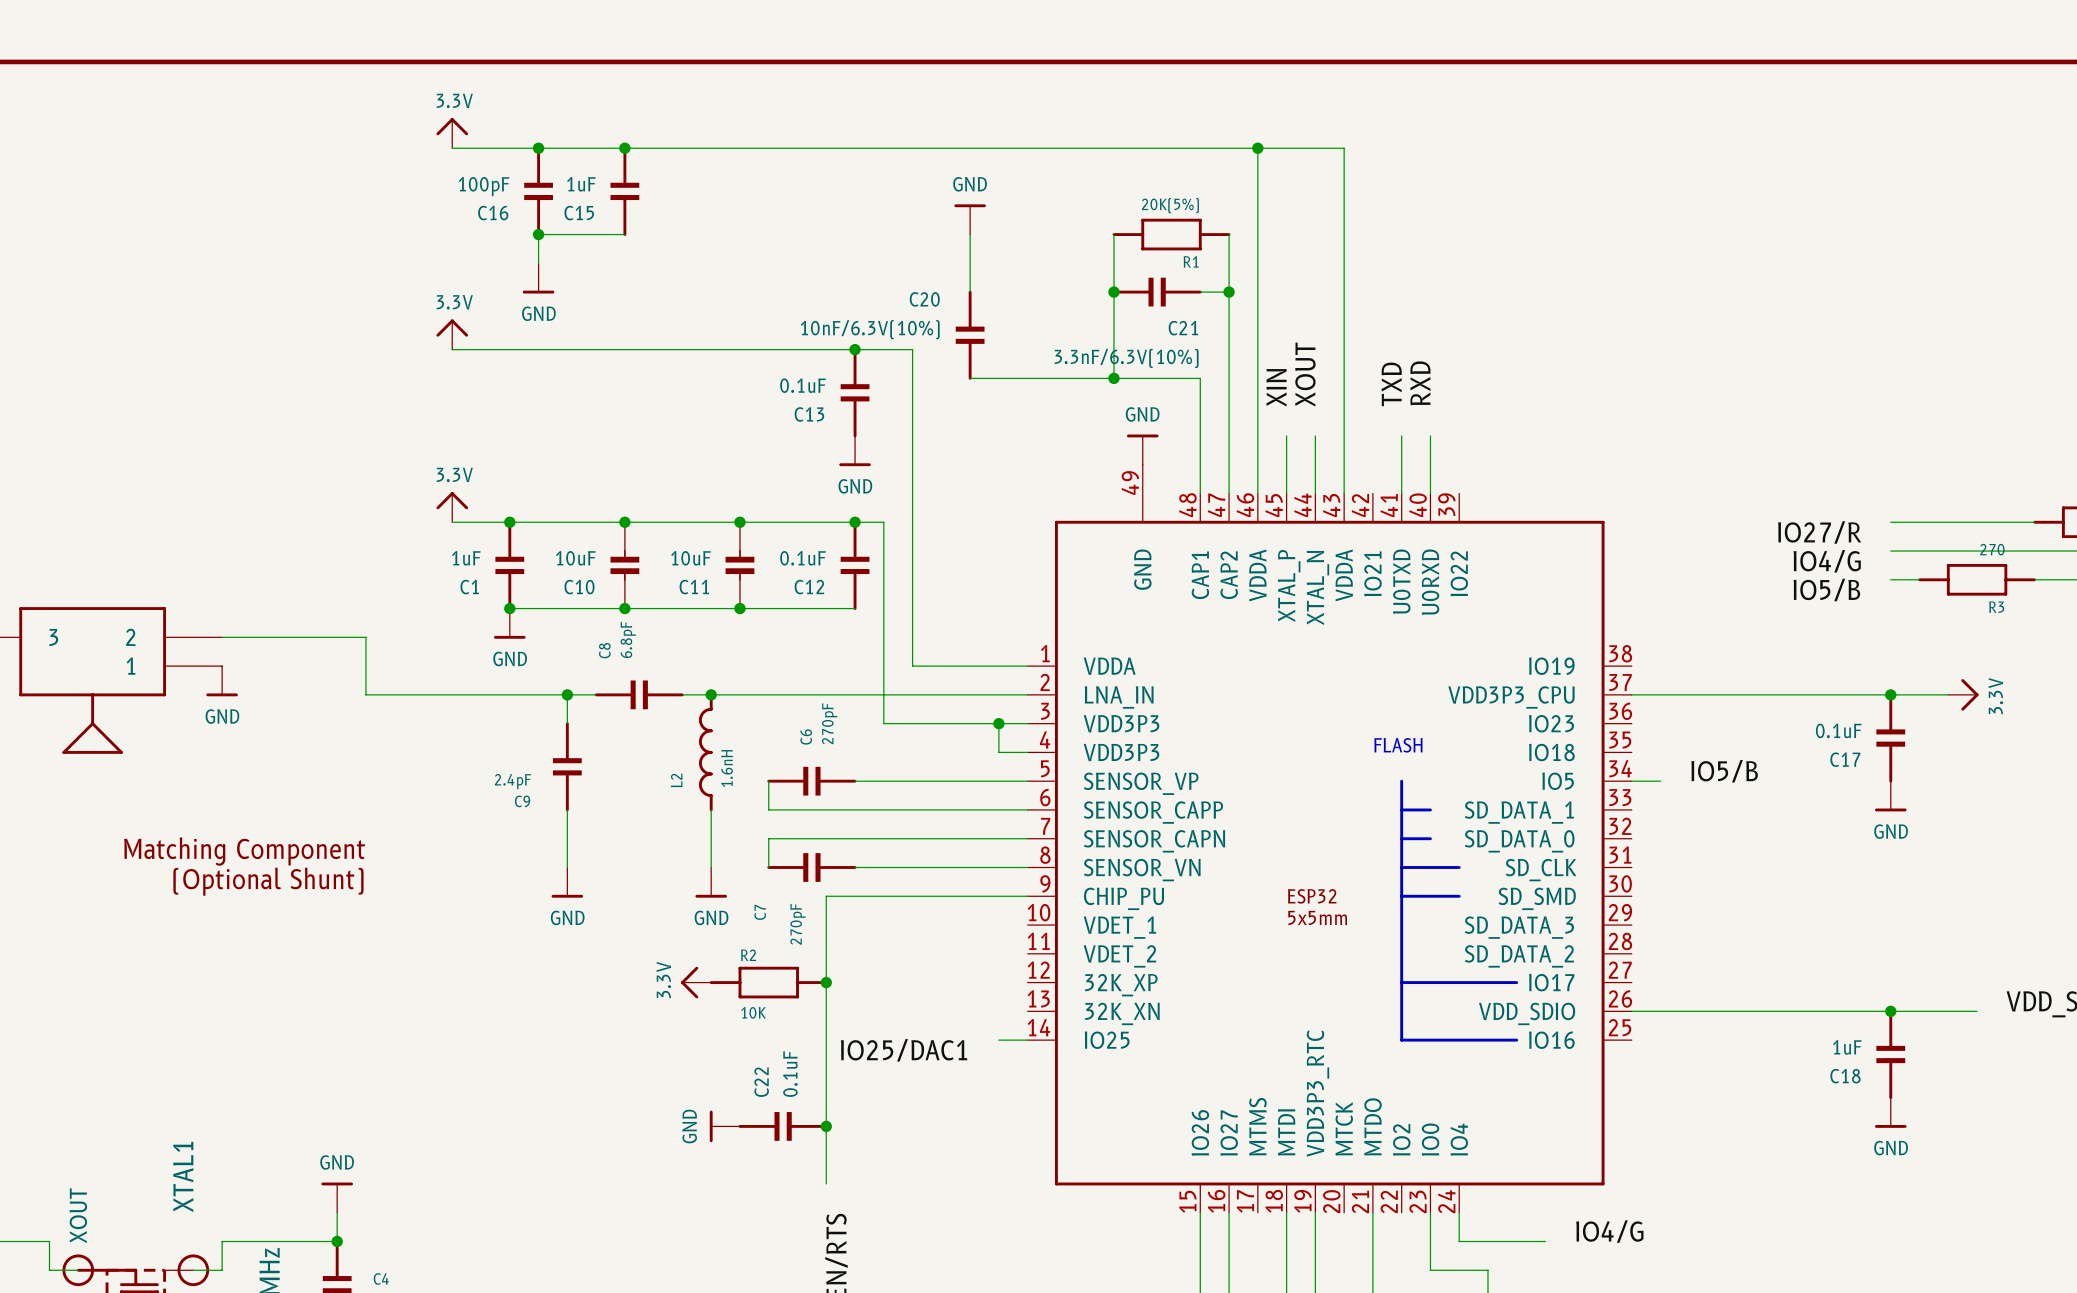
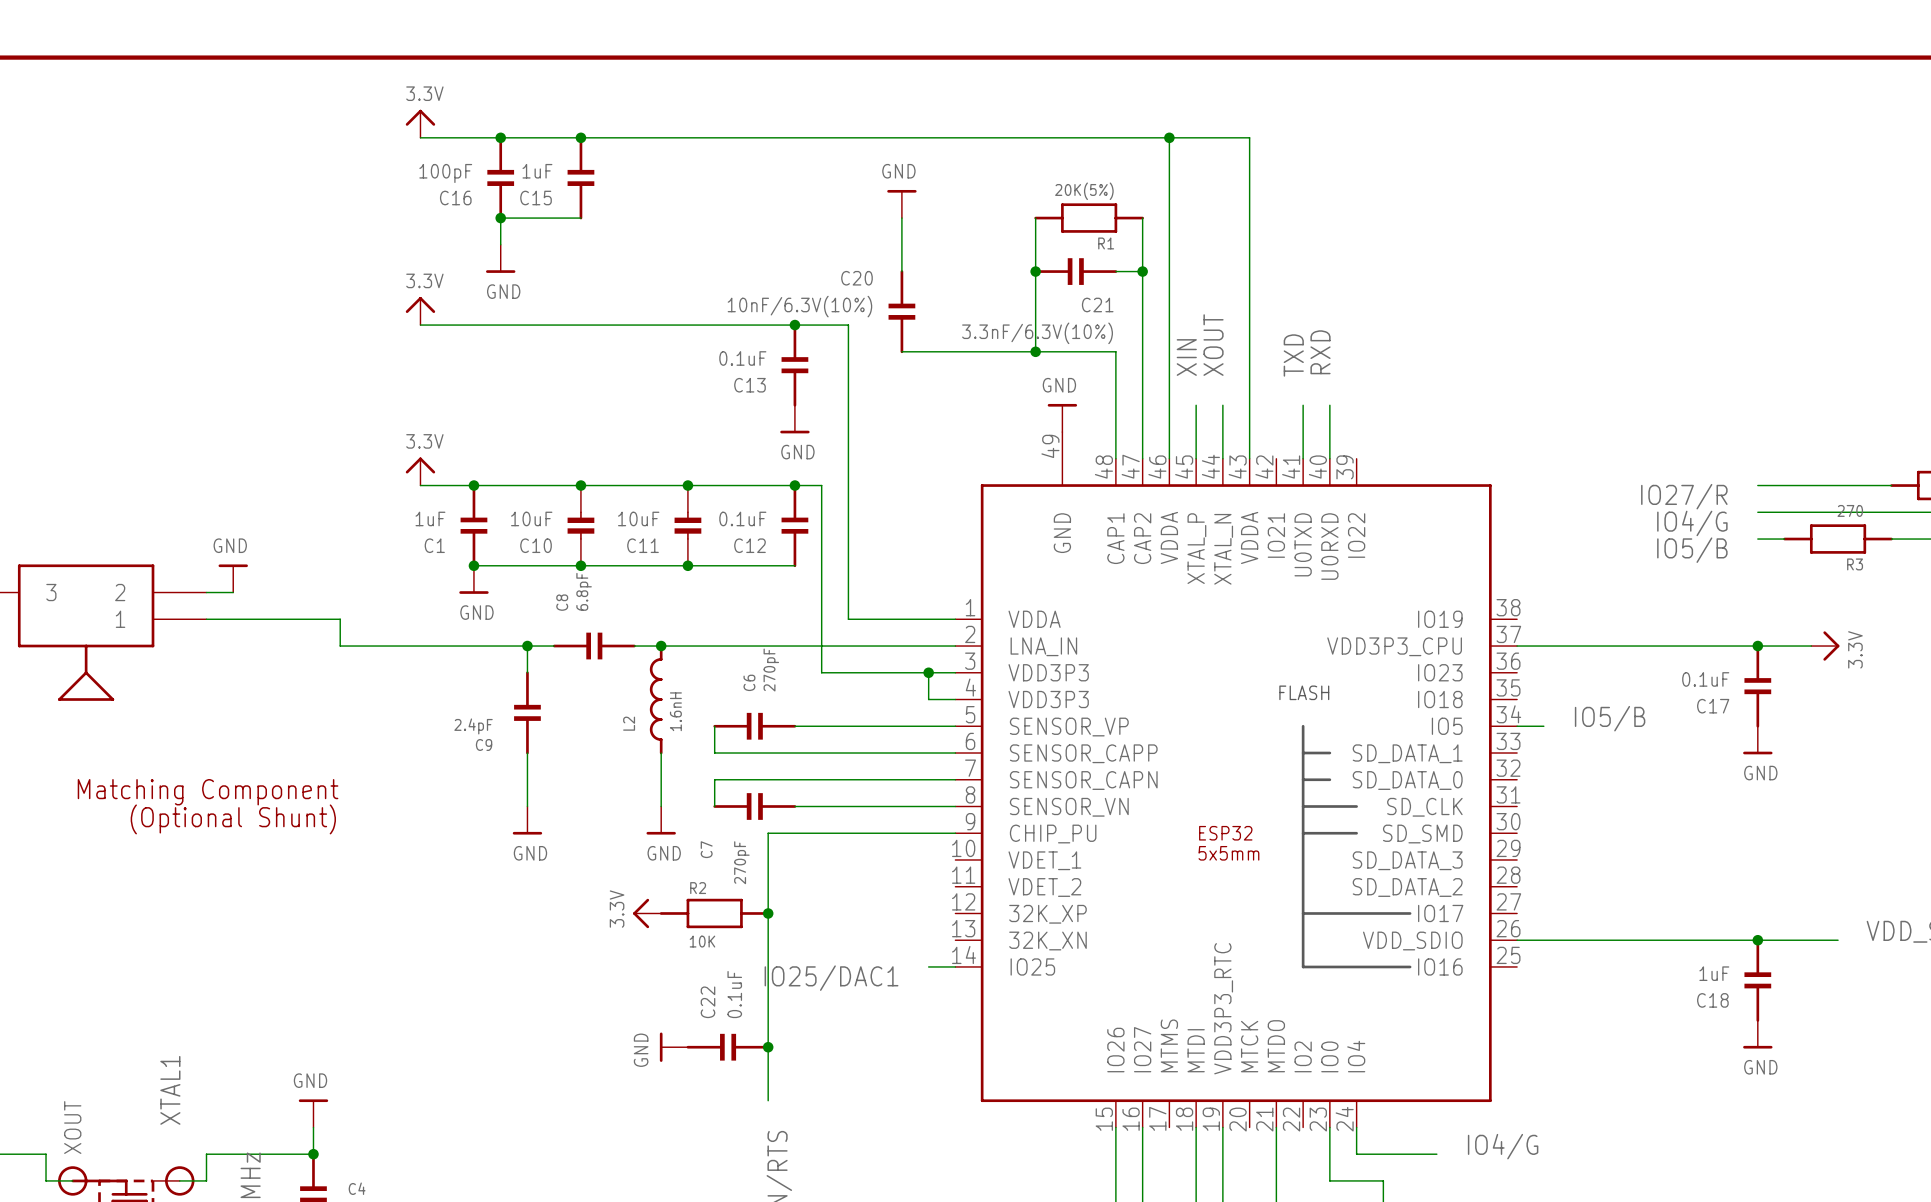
wire: (250, 637) (365, 637) (365, 666) -> (206, 619) (340, 619)
power symbol position: GND (222, 681) -> GND (233, 578)
power symbol rotation: 0° (222, 694) -> 180° (233, 565)

